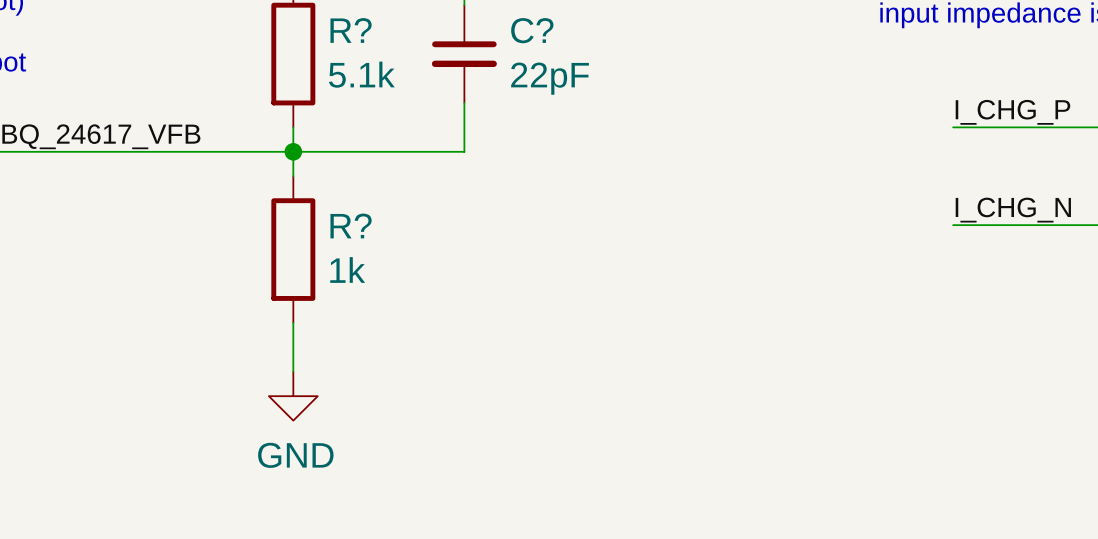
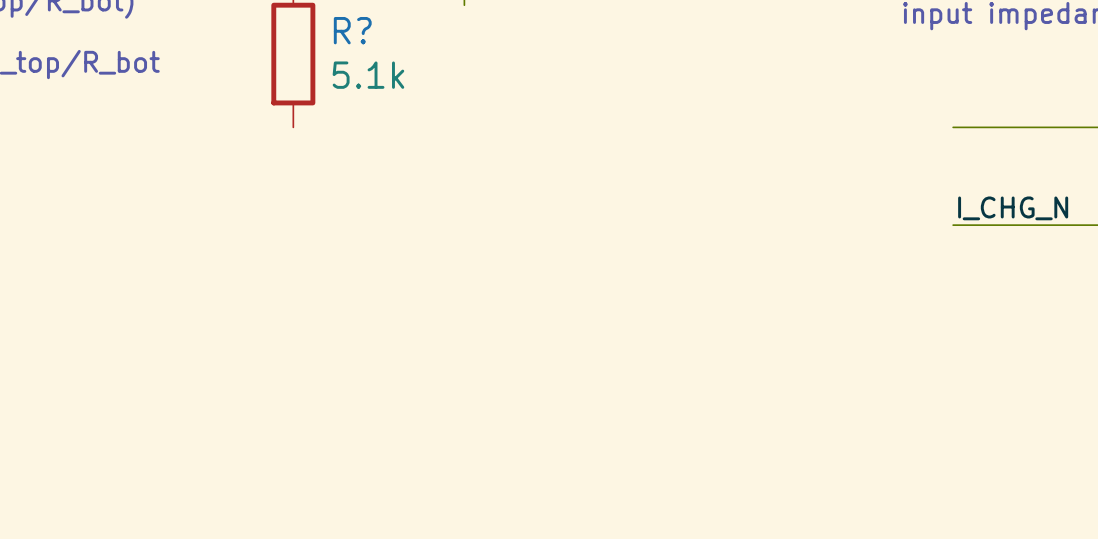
C?: 22pF (464, 54) -> none
wire: (464, 102) (464, 151) (0, 151) -> none
label: I_CHG_P (1012, 112) -> none
wire: (293, 127) (293, 176) -> none
label: BQ_24617_VFB (101, 136) -> none
junction: (293, 151) -> none
R?: 1k (293, 249) -> none
wire: (293, 322) (293, 371) -> none
power symbol: GND (293, 396) -> none

